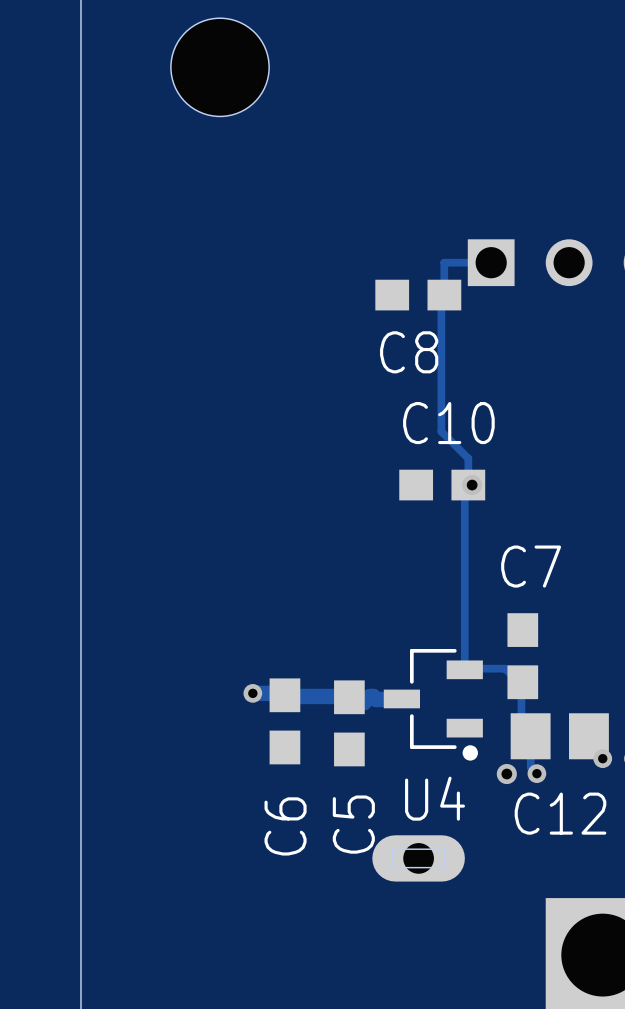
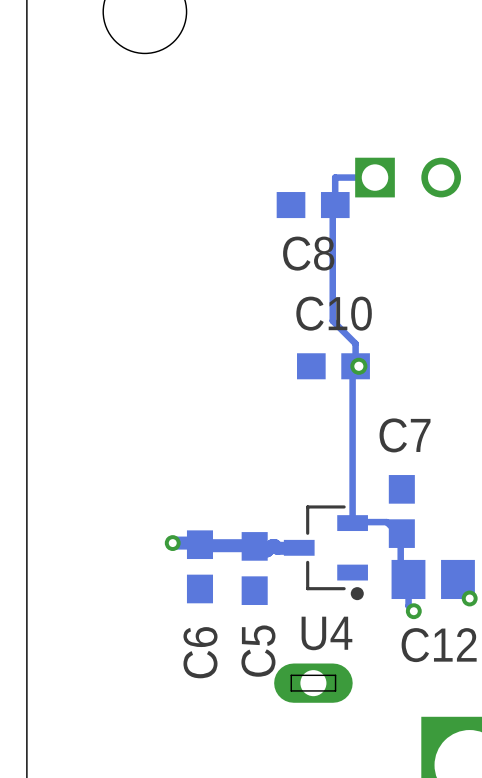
via: (506, 774) -> none

